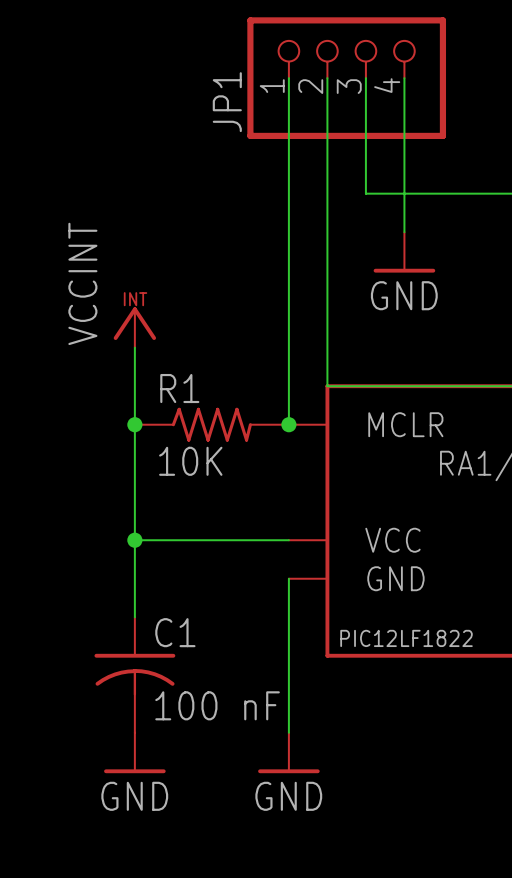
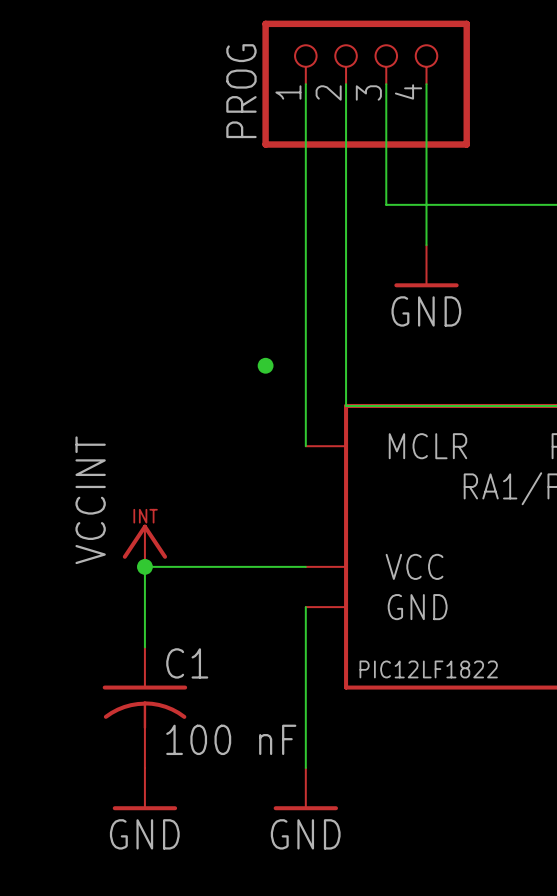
JP1 name: JP1 (227, 102) -> PROG (241, 91)
power symbol position: VCCINT (134, 327) -> VCCINT (144, 545)
wire: (134, 347) (134, 540) -> none
junction: none -> (265, 365)
junction: (134, 424) -> none
R1: 10K (211, 424) -> none
junction: (288, 424) -> none

